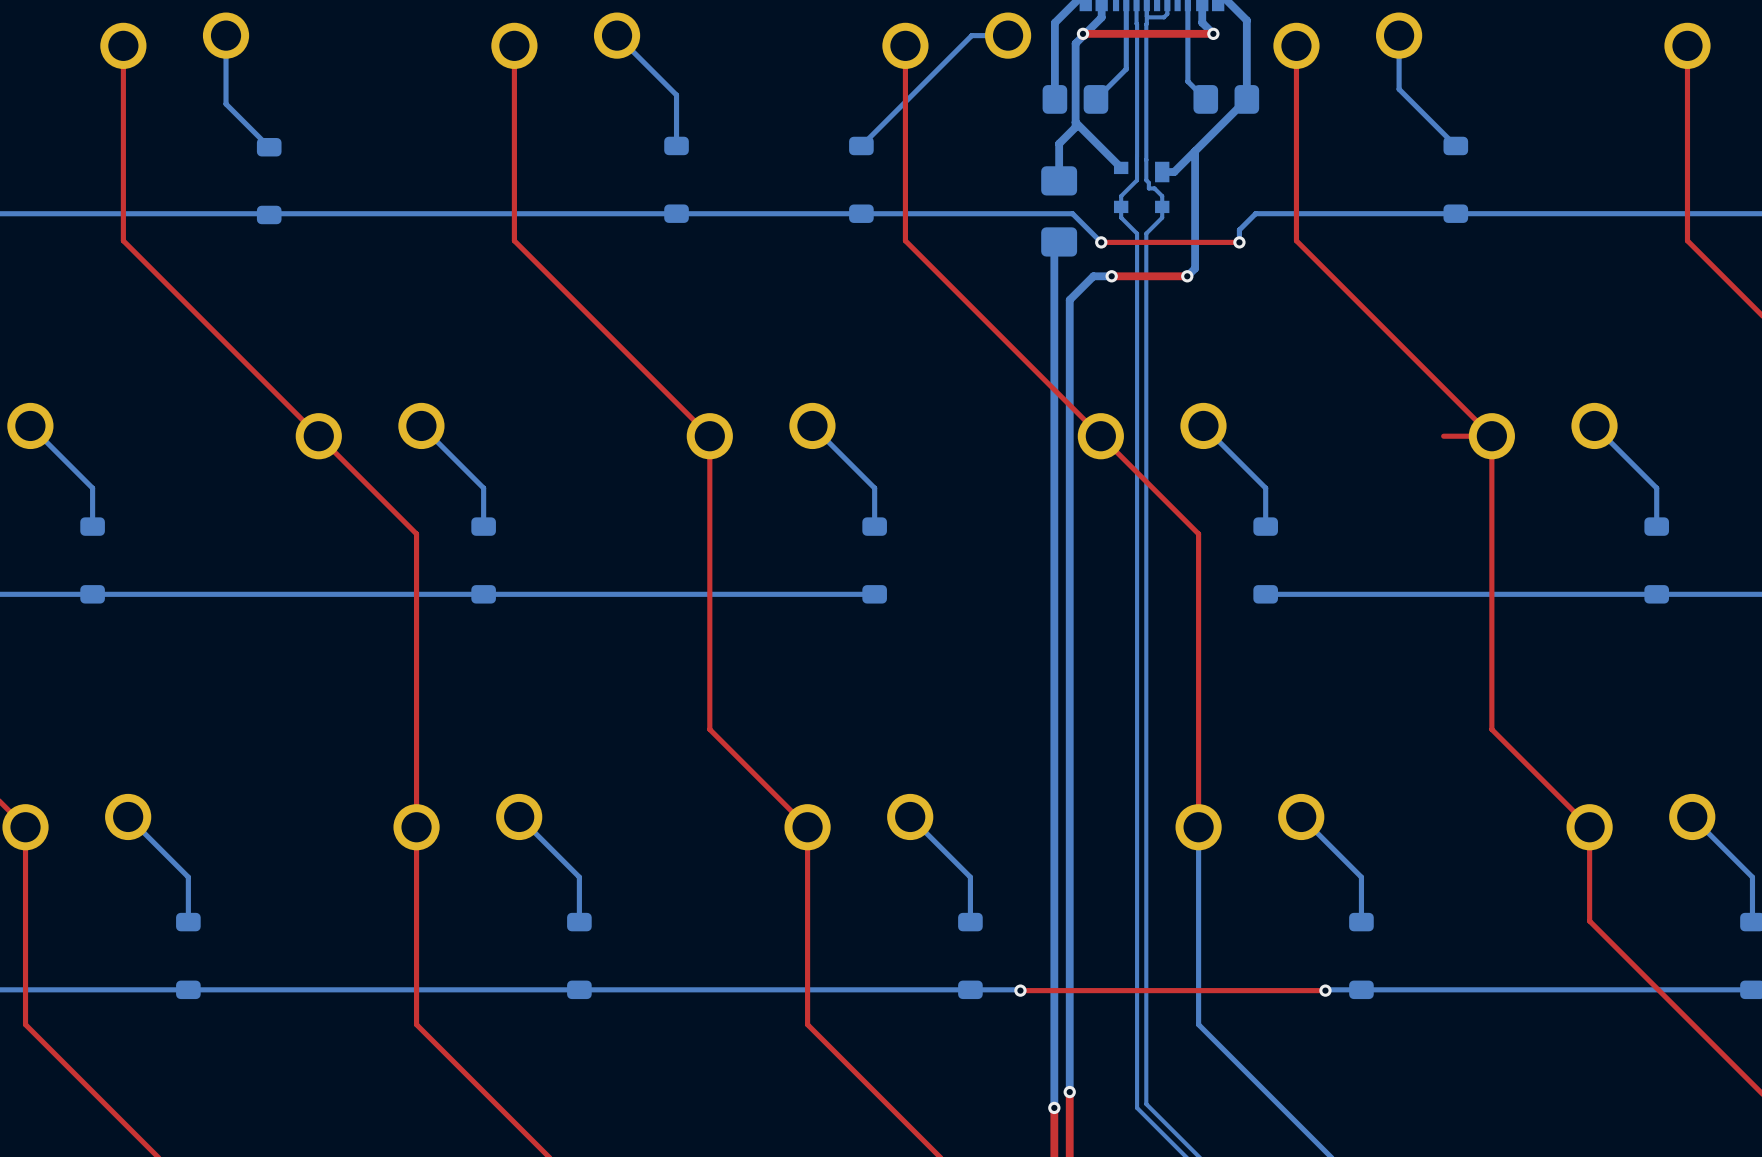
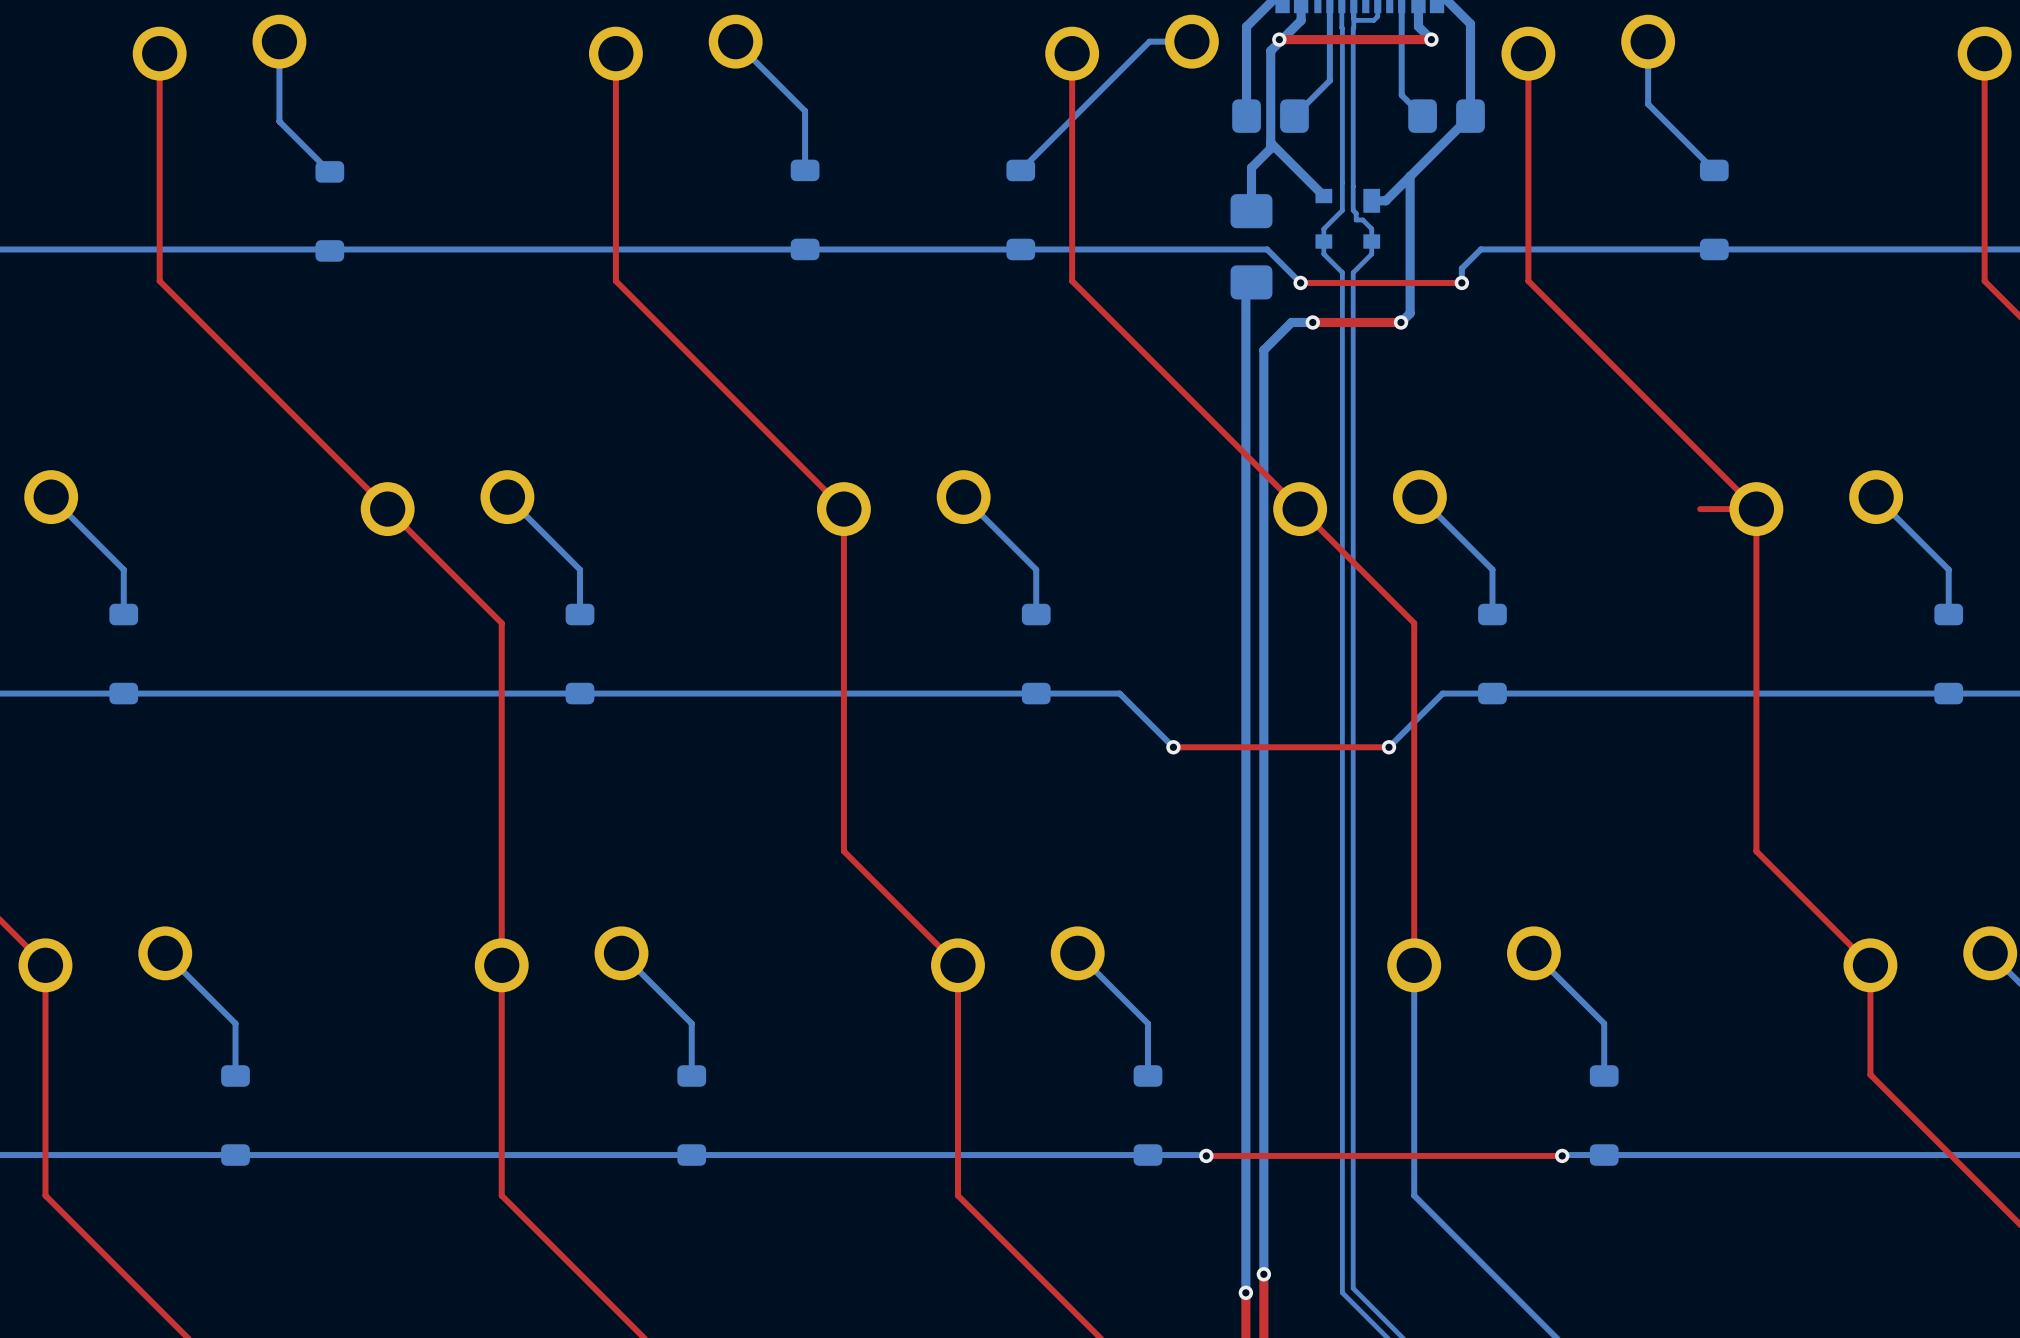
bottom track: none -> (1036, 693) (1119, 693) (1173, 747)
bottom track: none -> (1492, 693) (1442, 693) (1388, 747)
top track: none -> (1173, 747) (1388, 747)
via: none -> (1173, 747)
via: none -> (1388, 747)

